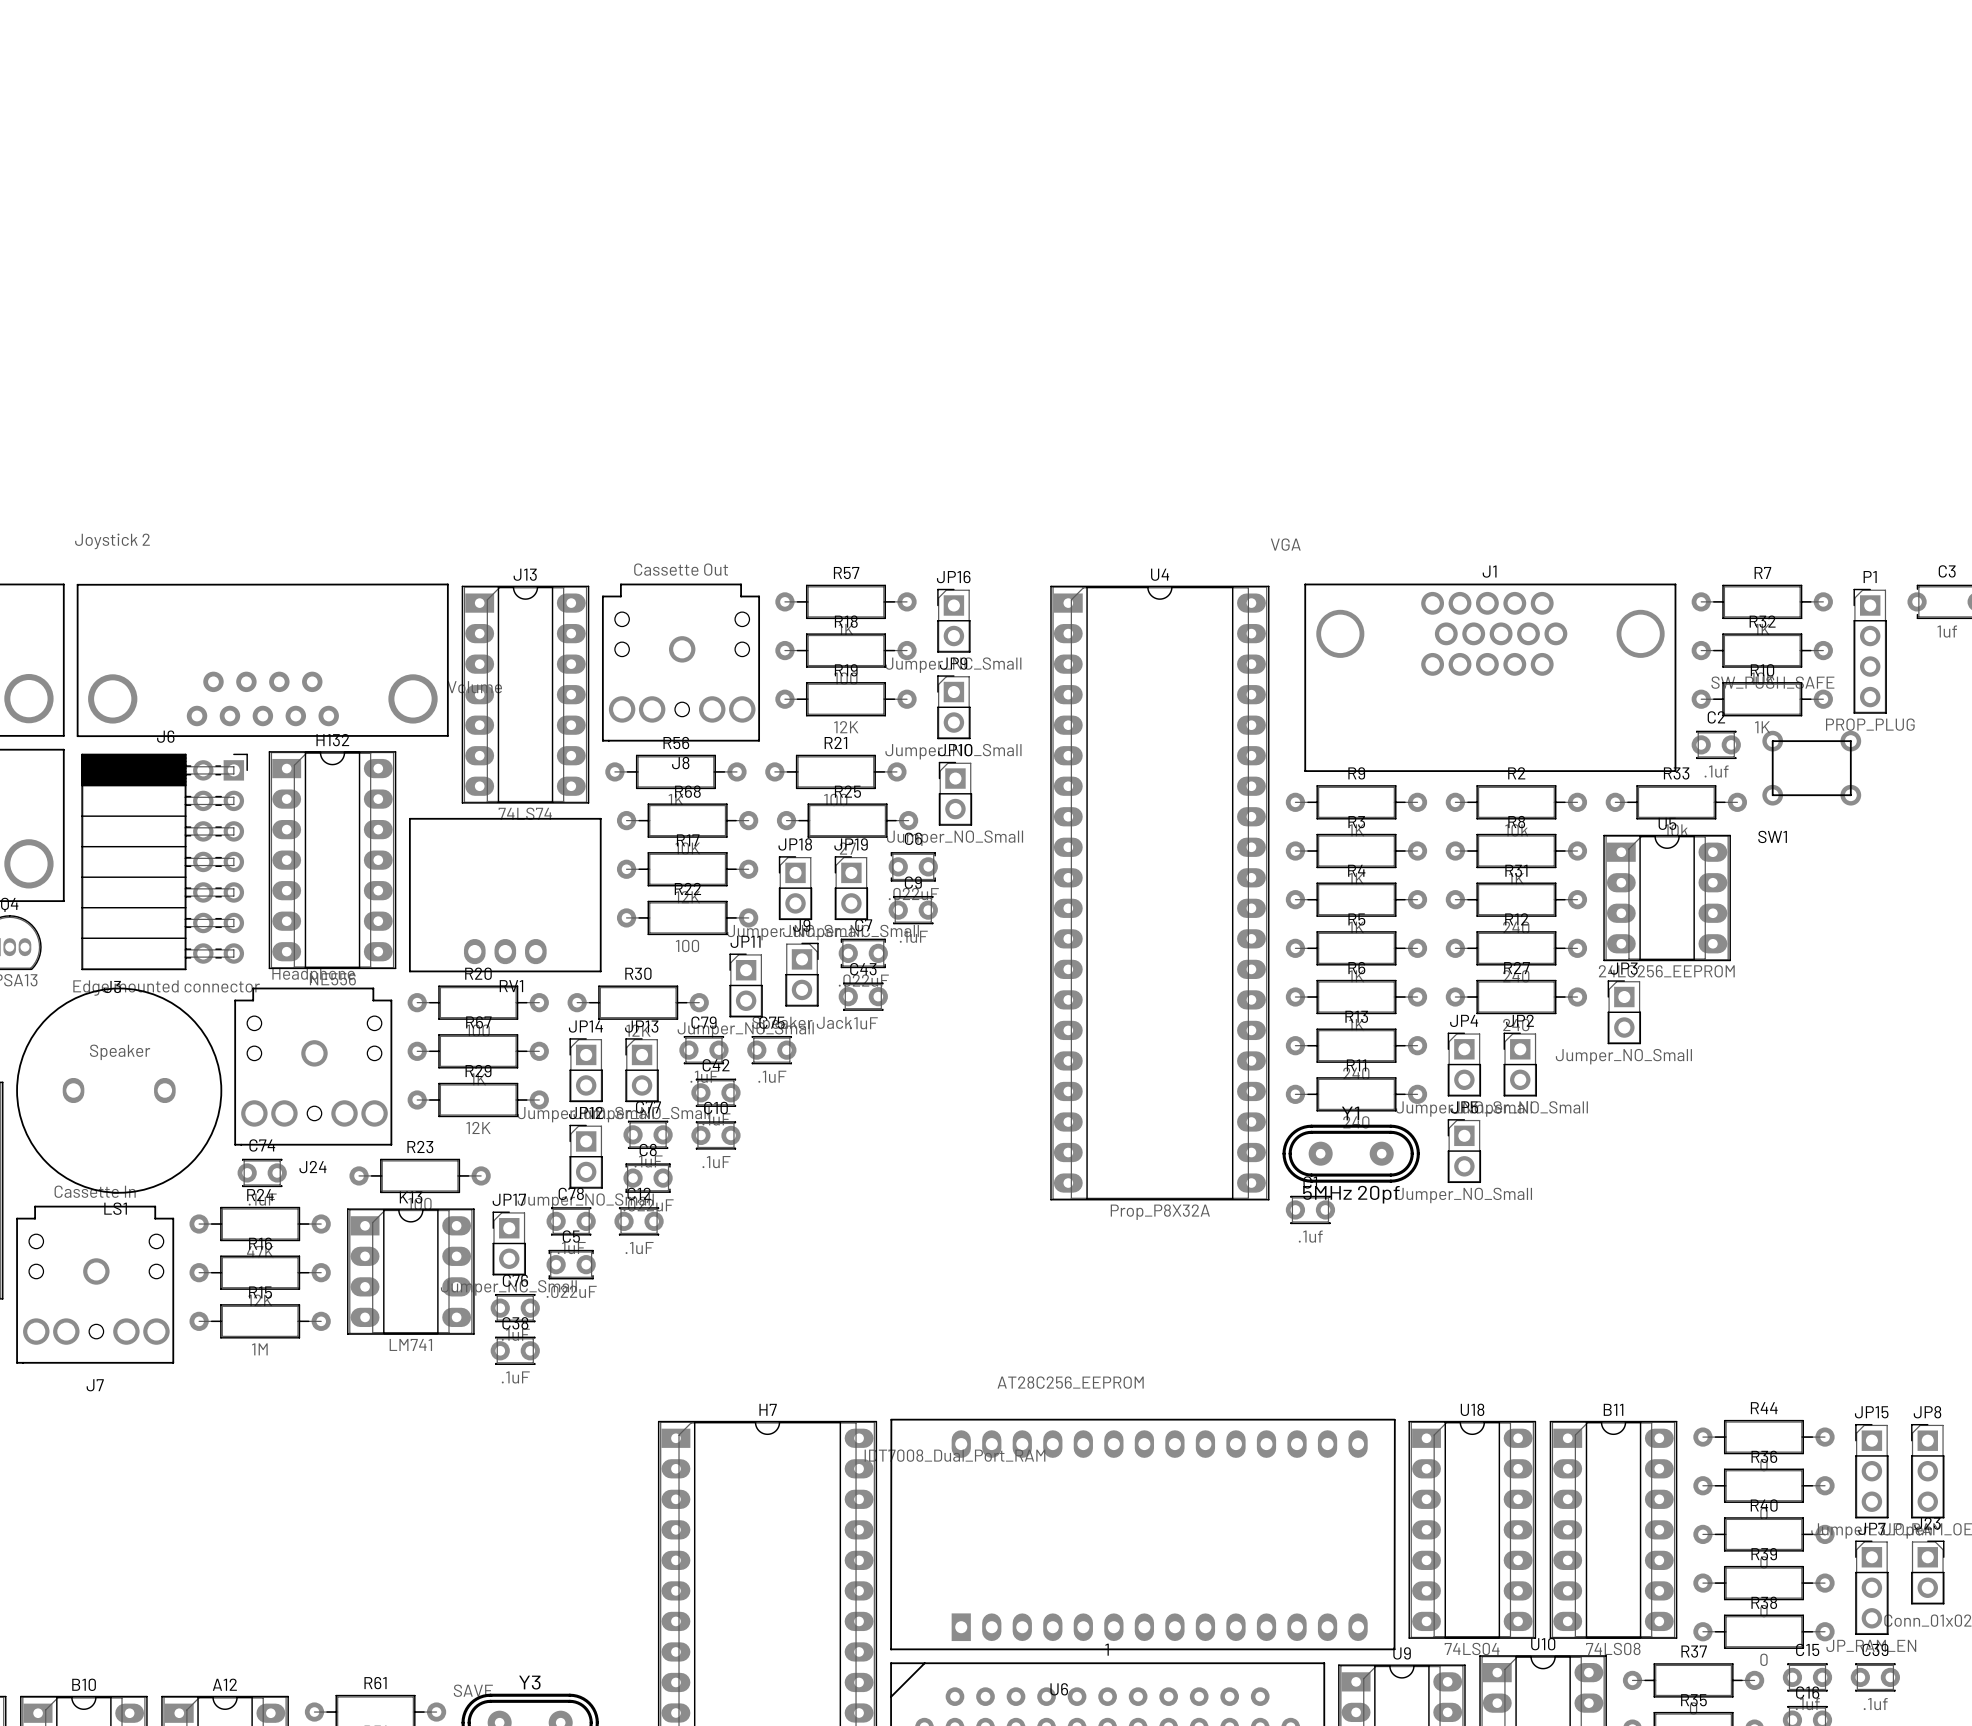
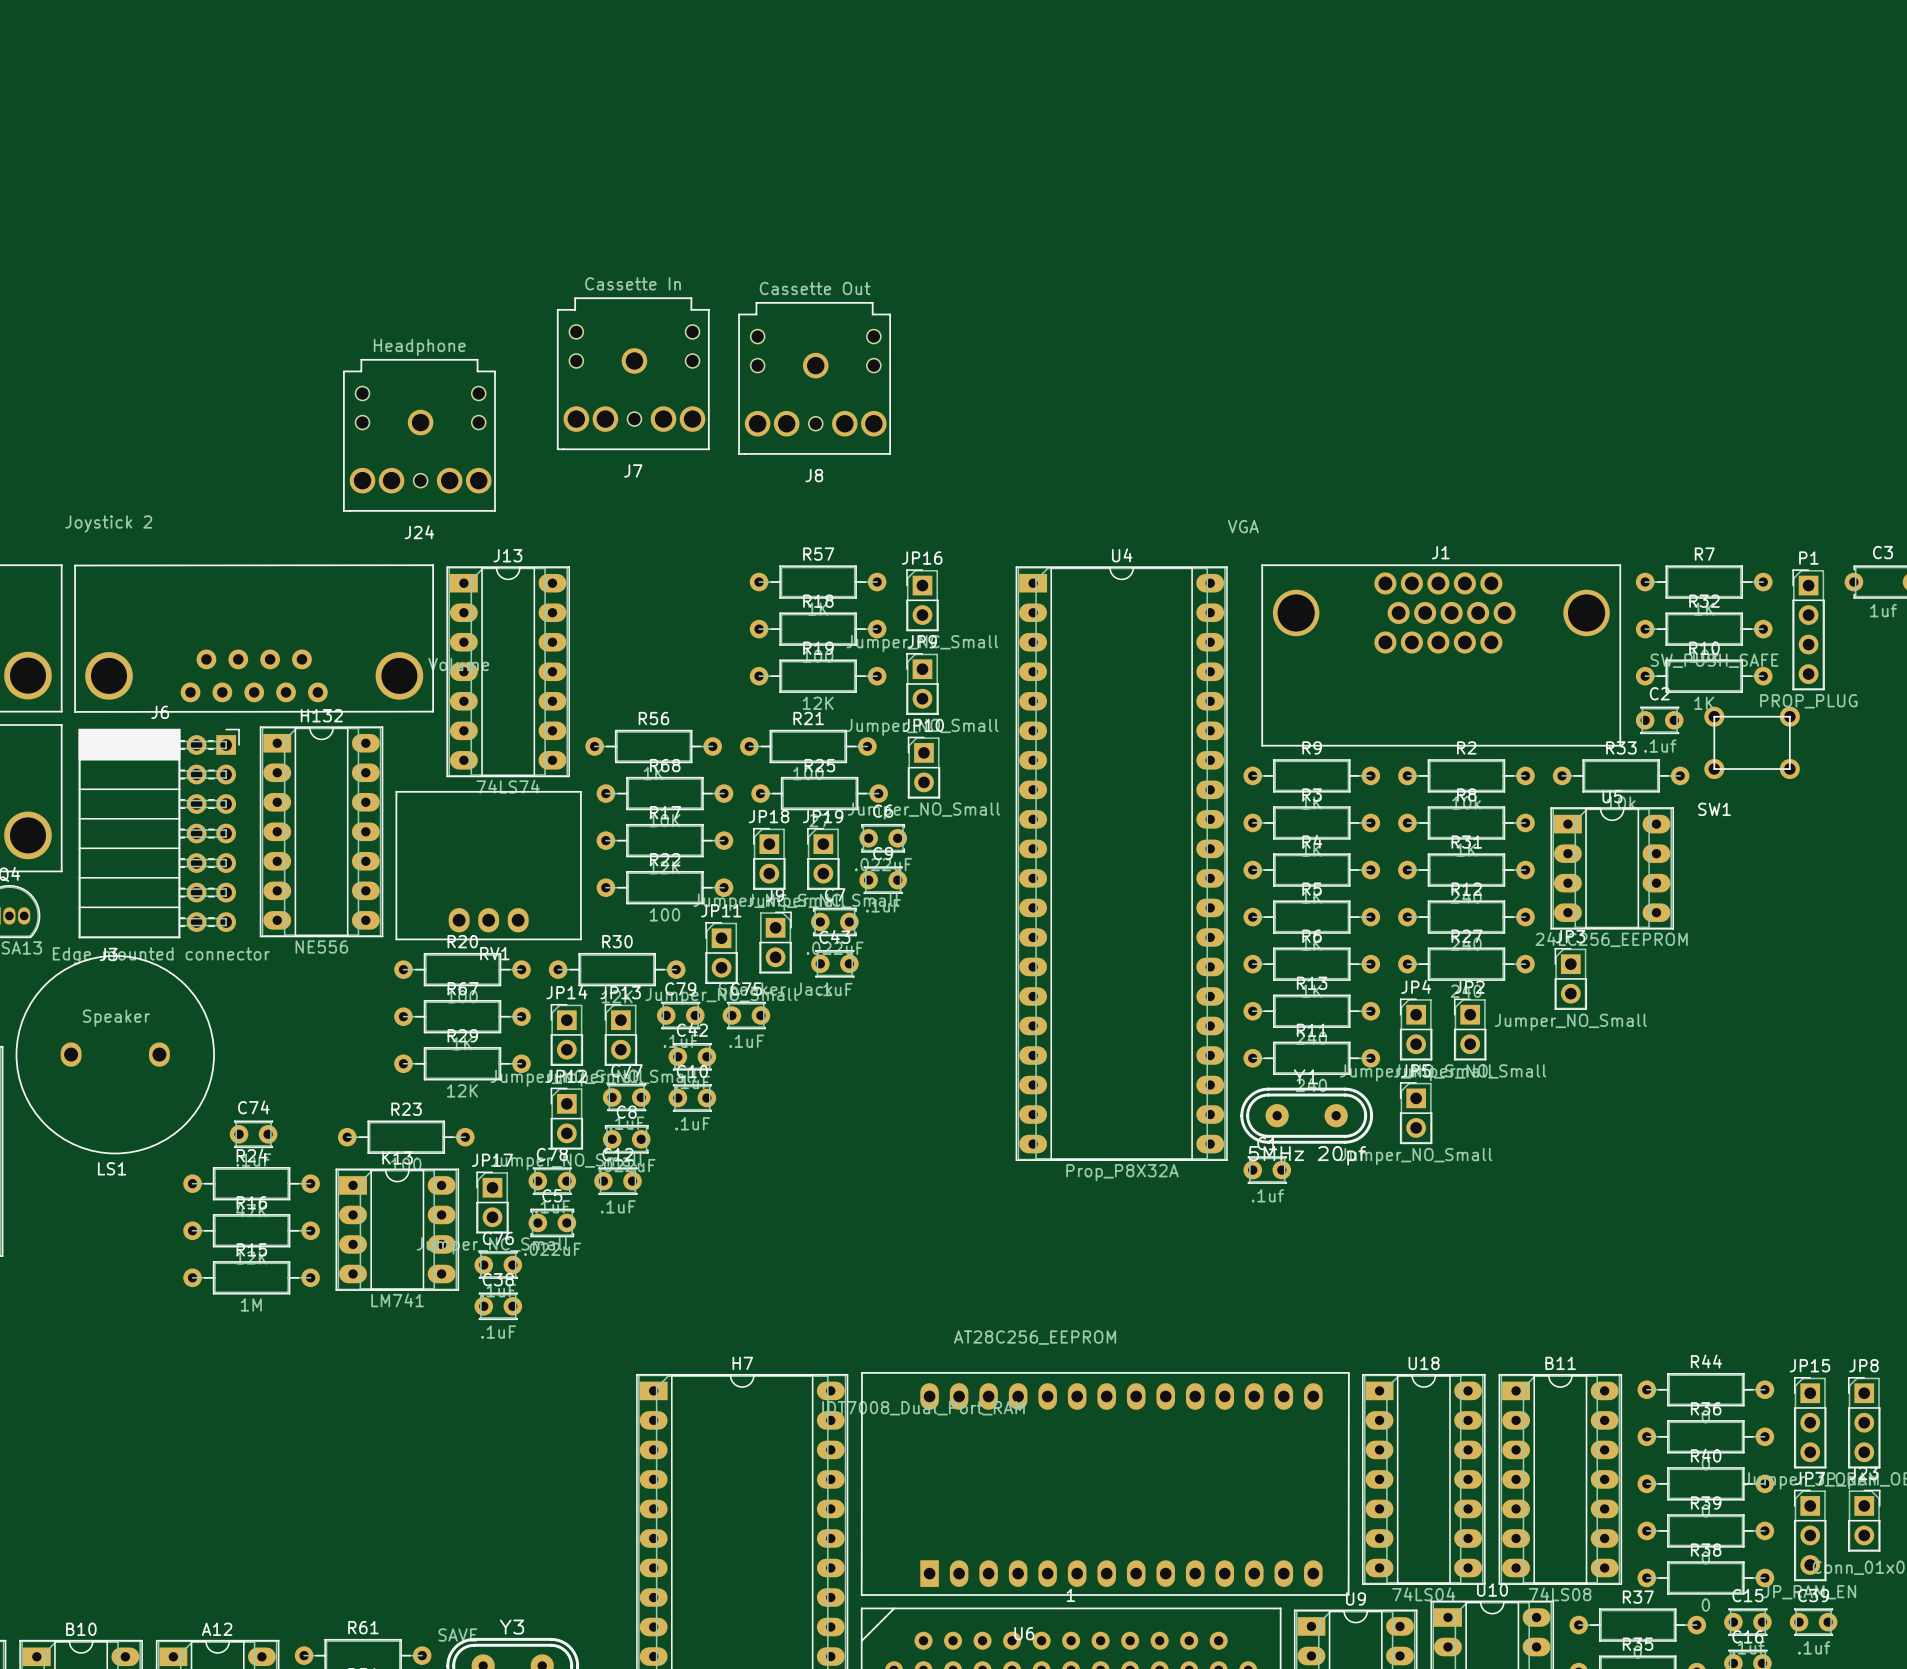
J8 position: (680, 662) -> (814, 378)
J24 position: (313, 1066) -> (419, 435)
J7 position: (95, 1284) -> (633, 373)

